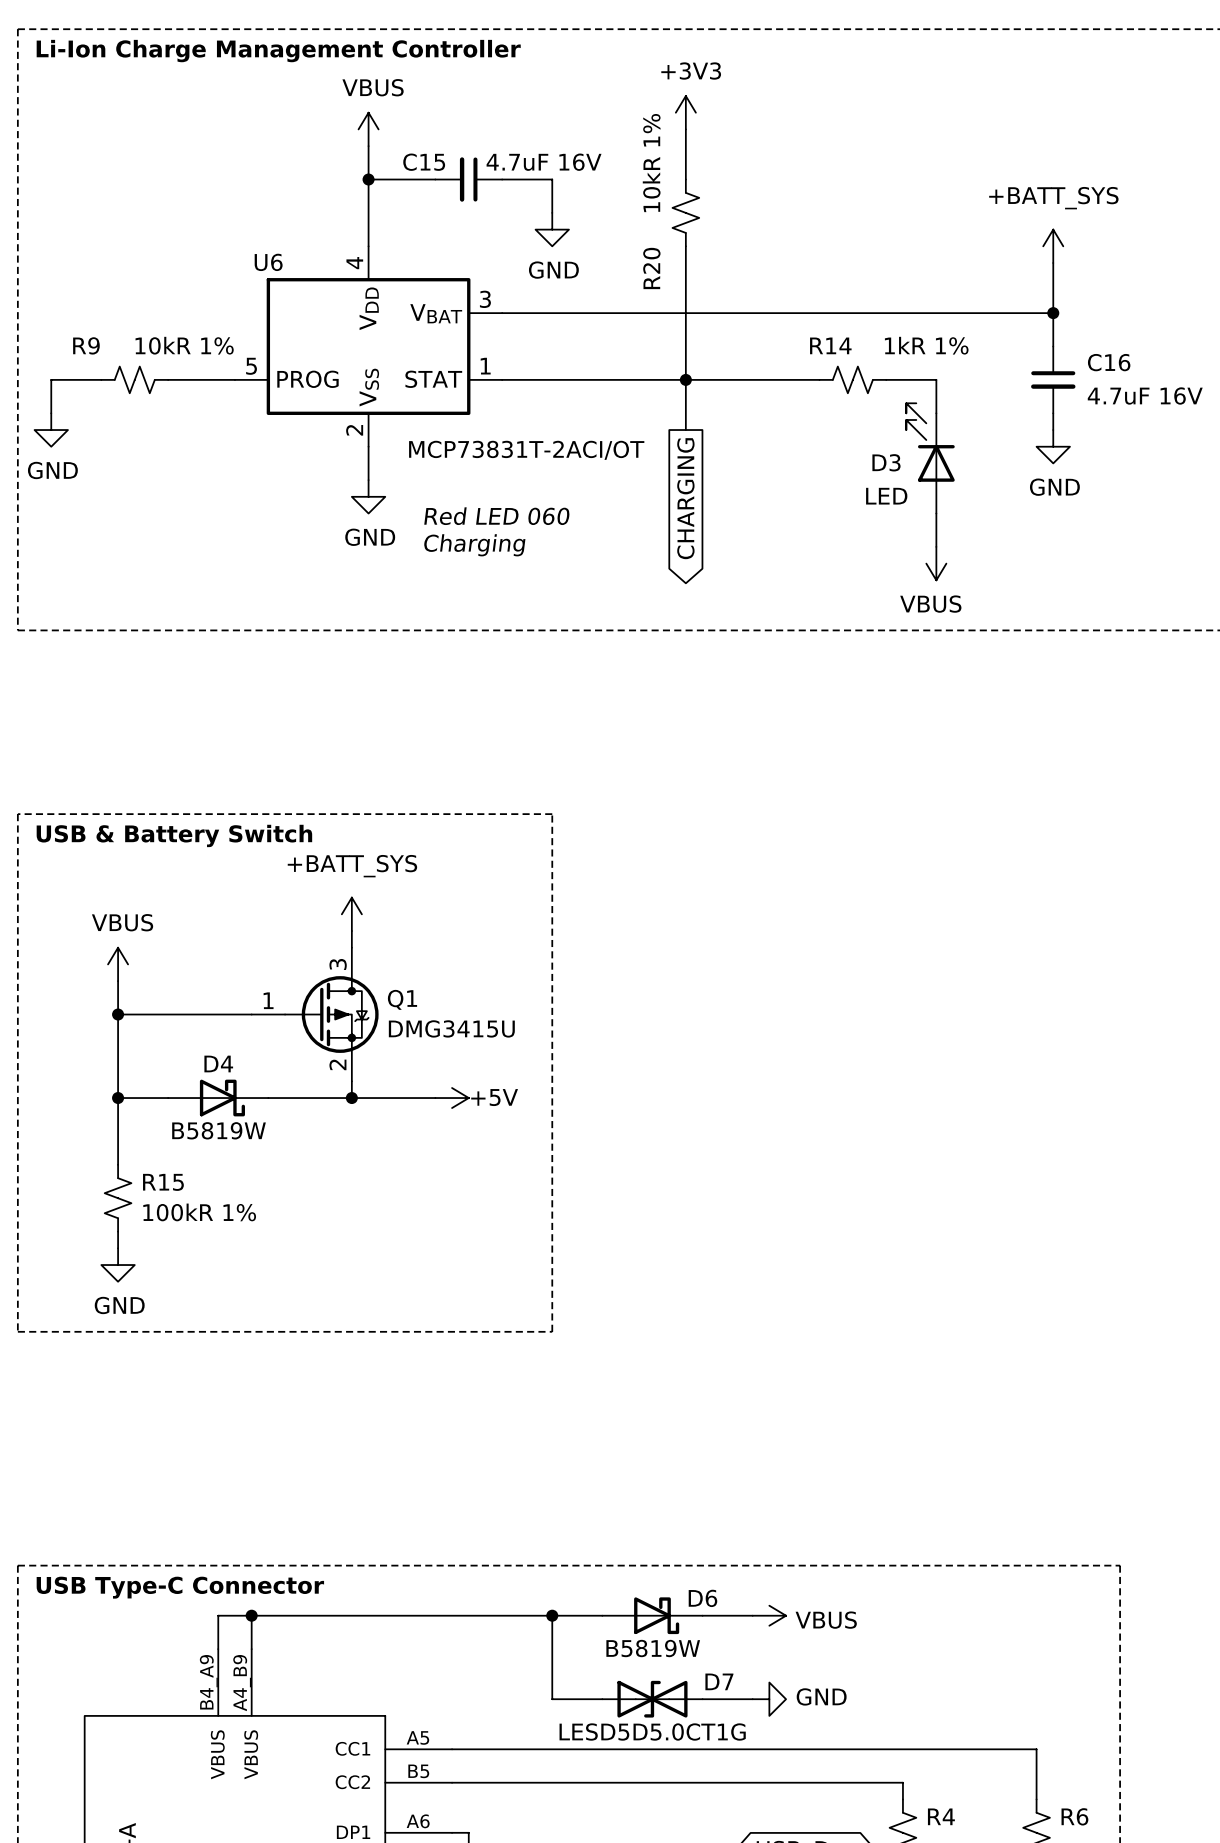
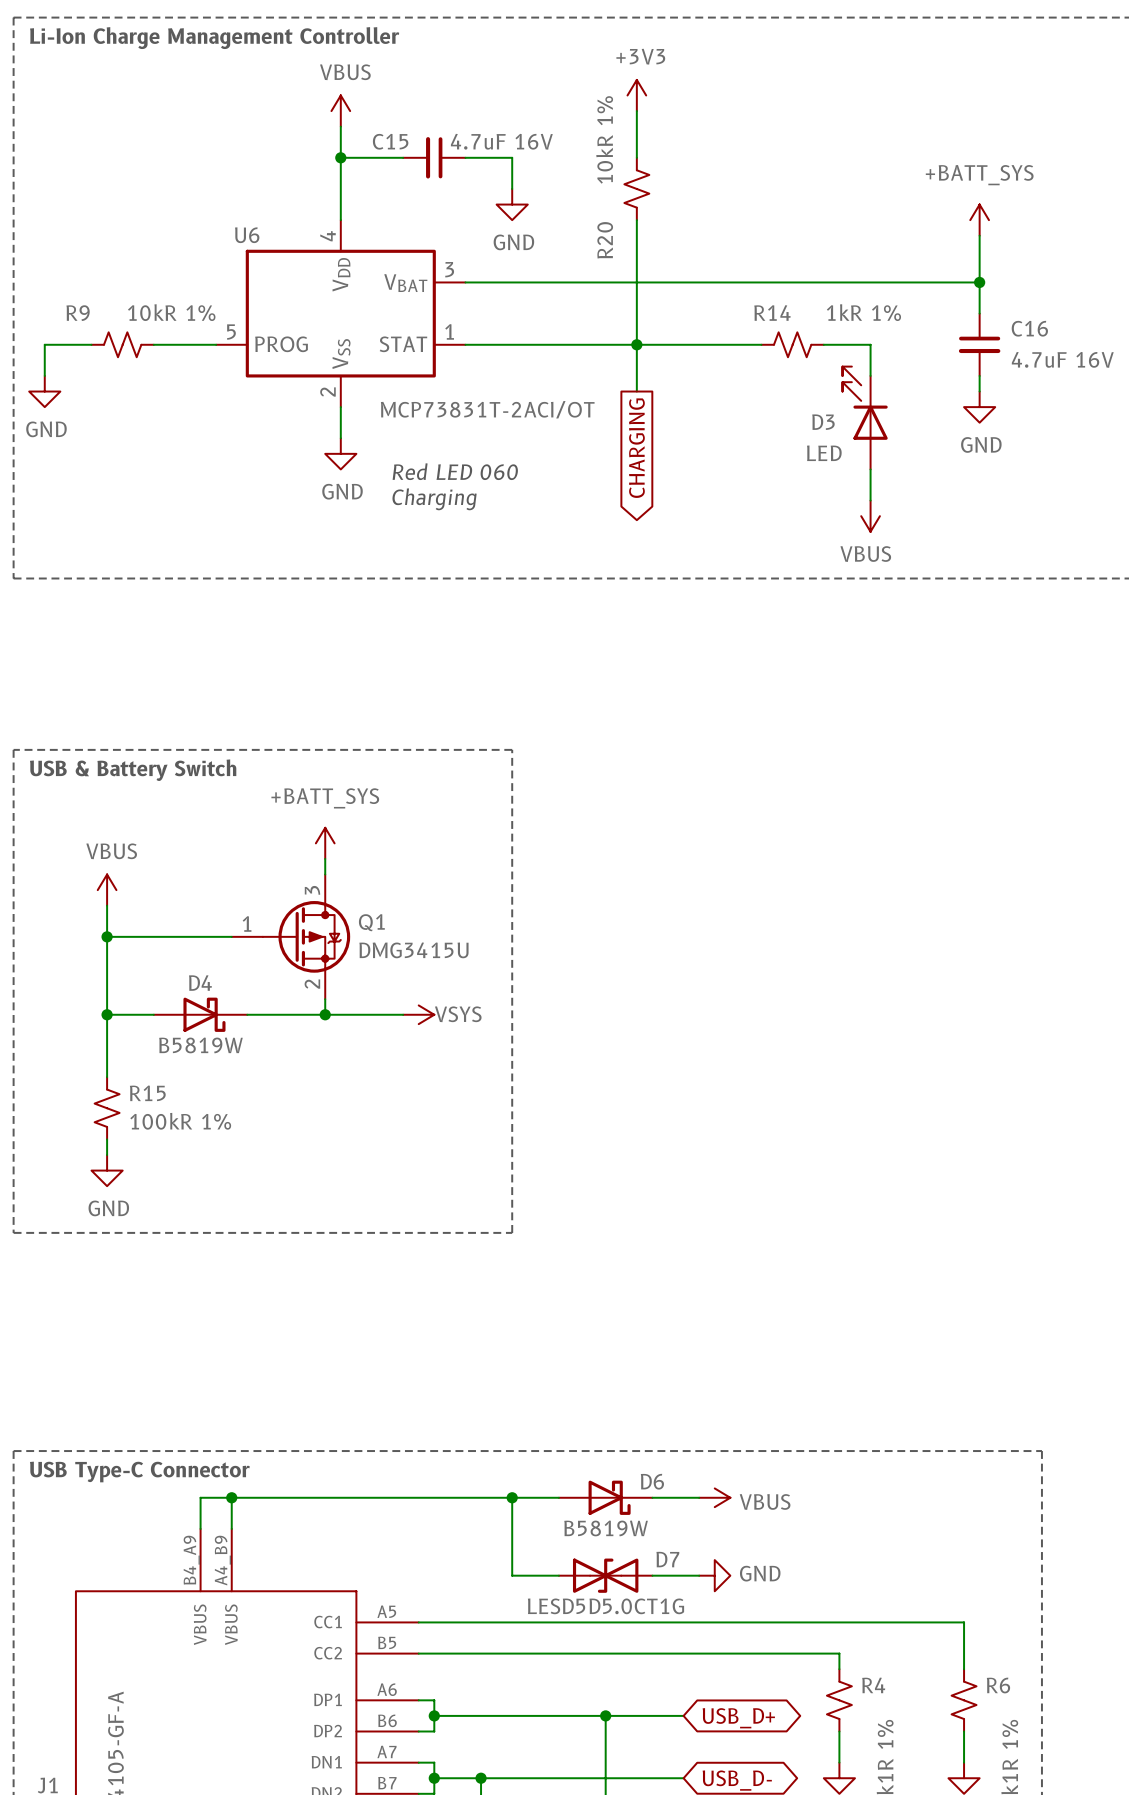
power symbol: +5V (452, 1098) -> VSYS (418, 1014)

